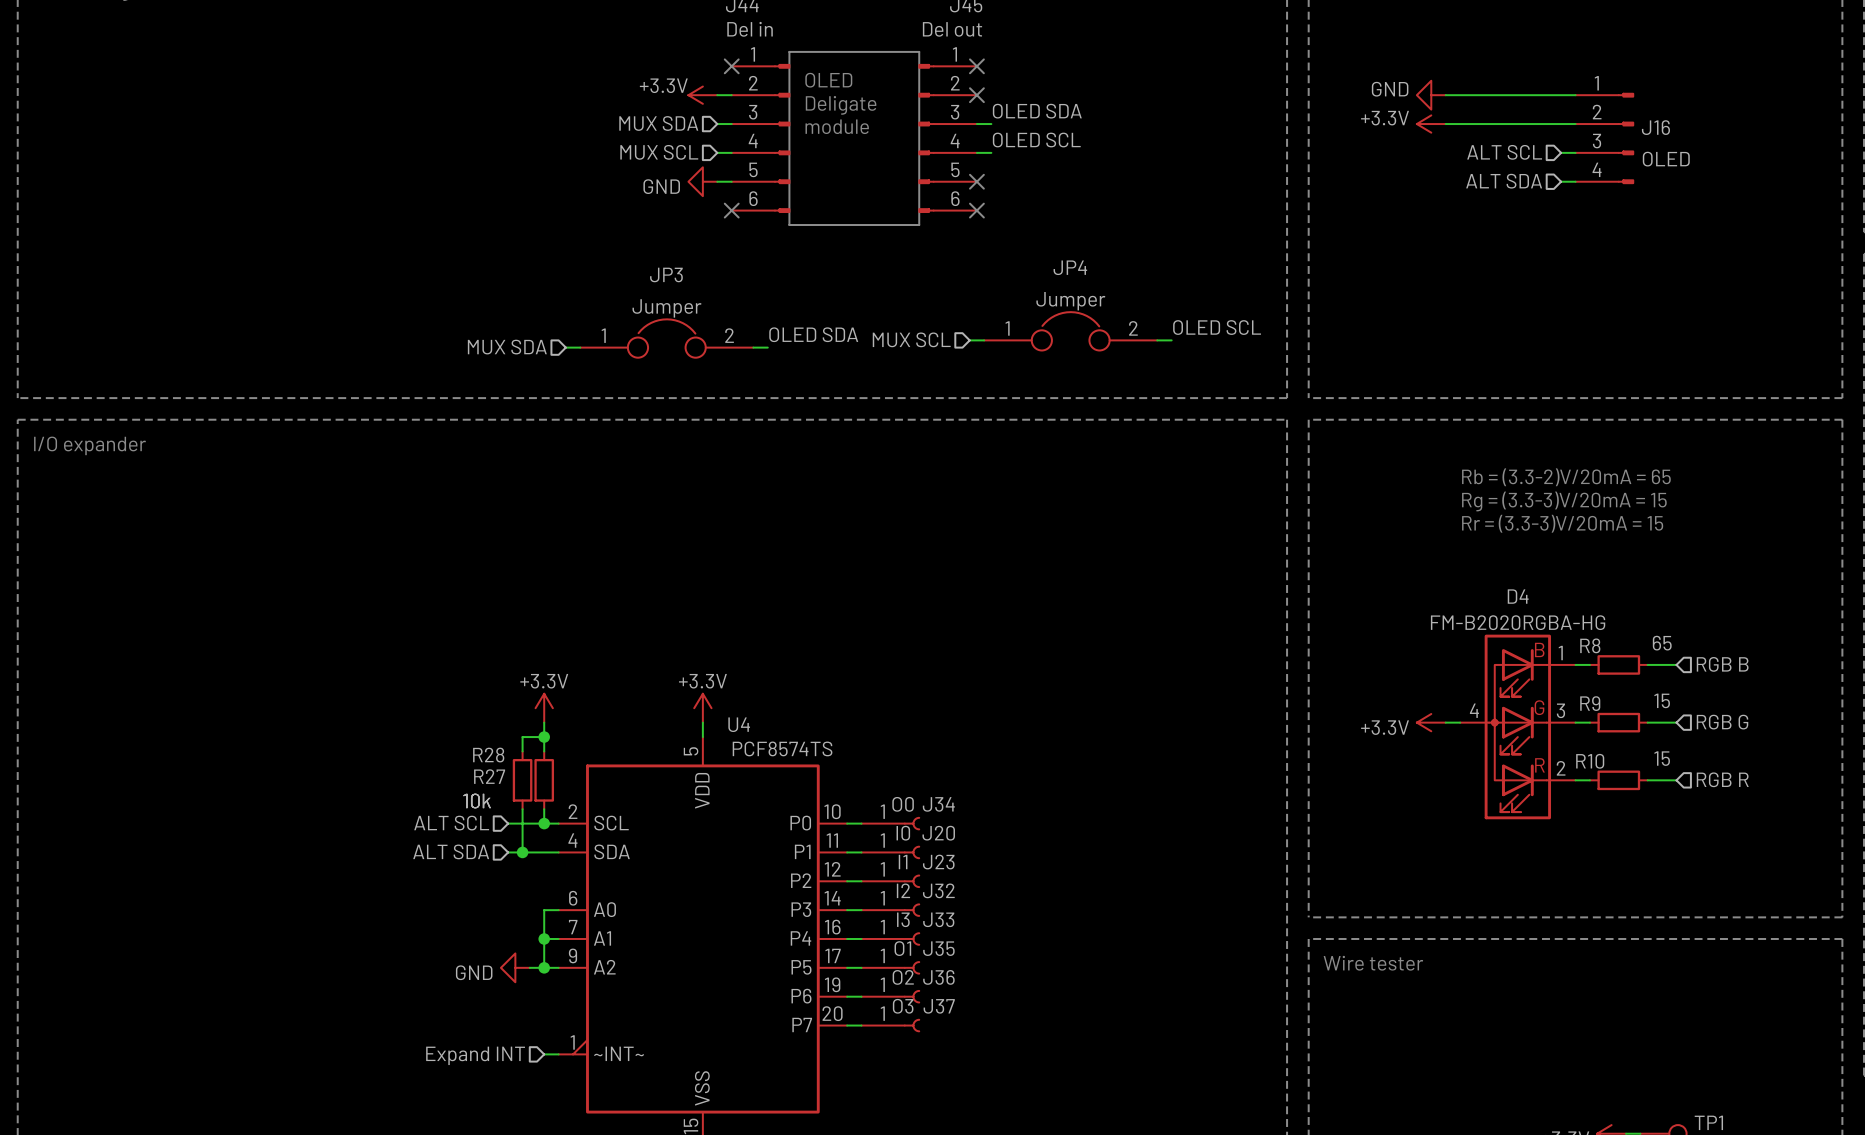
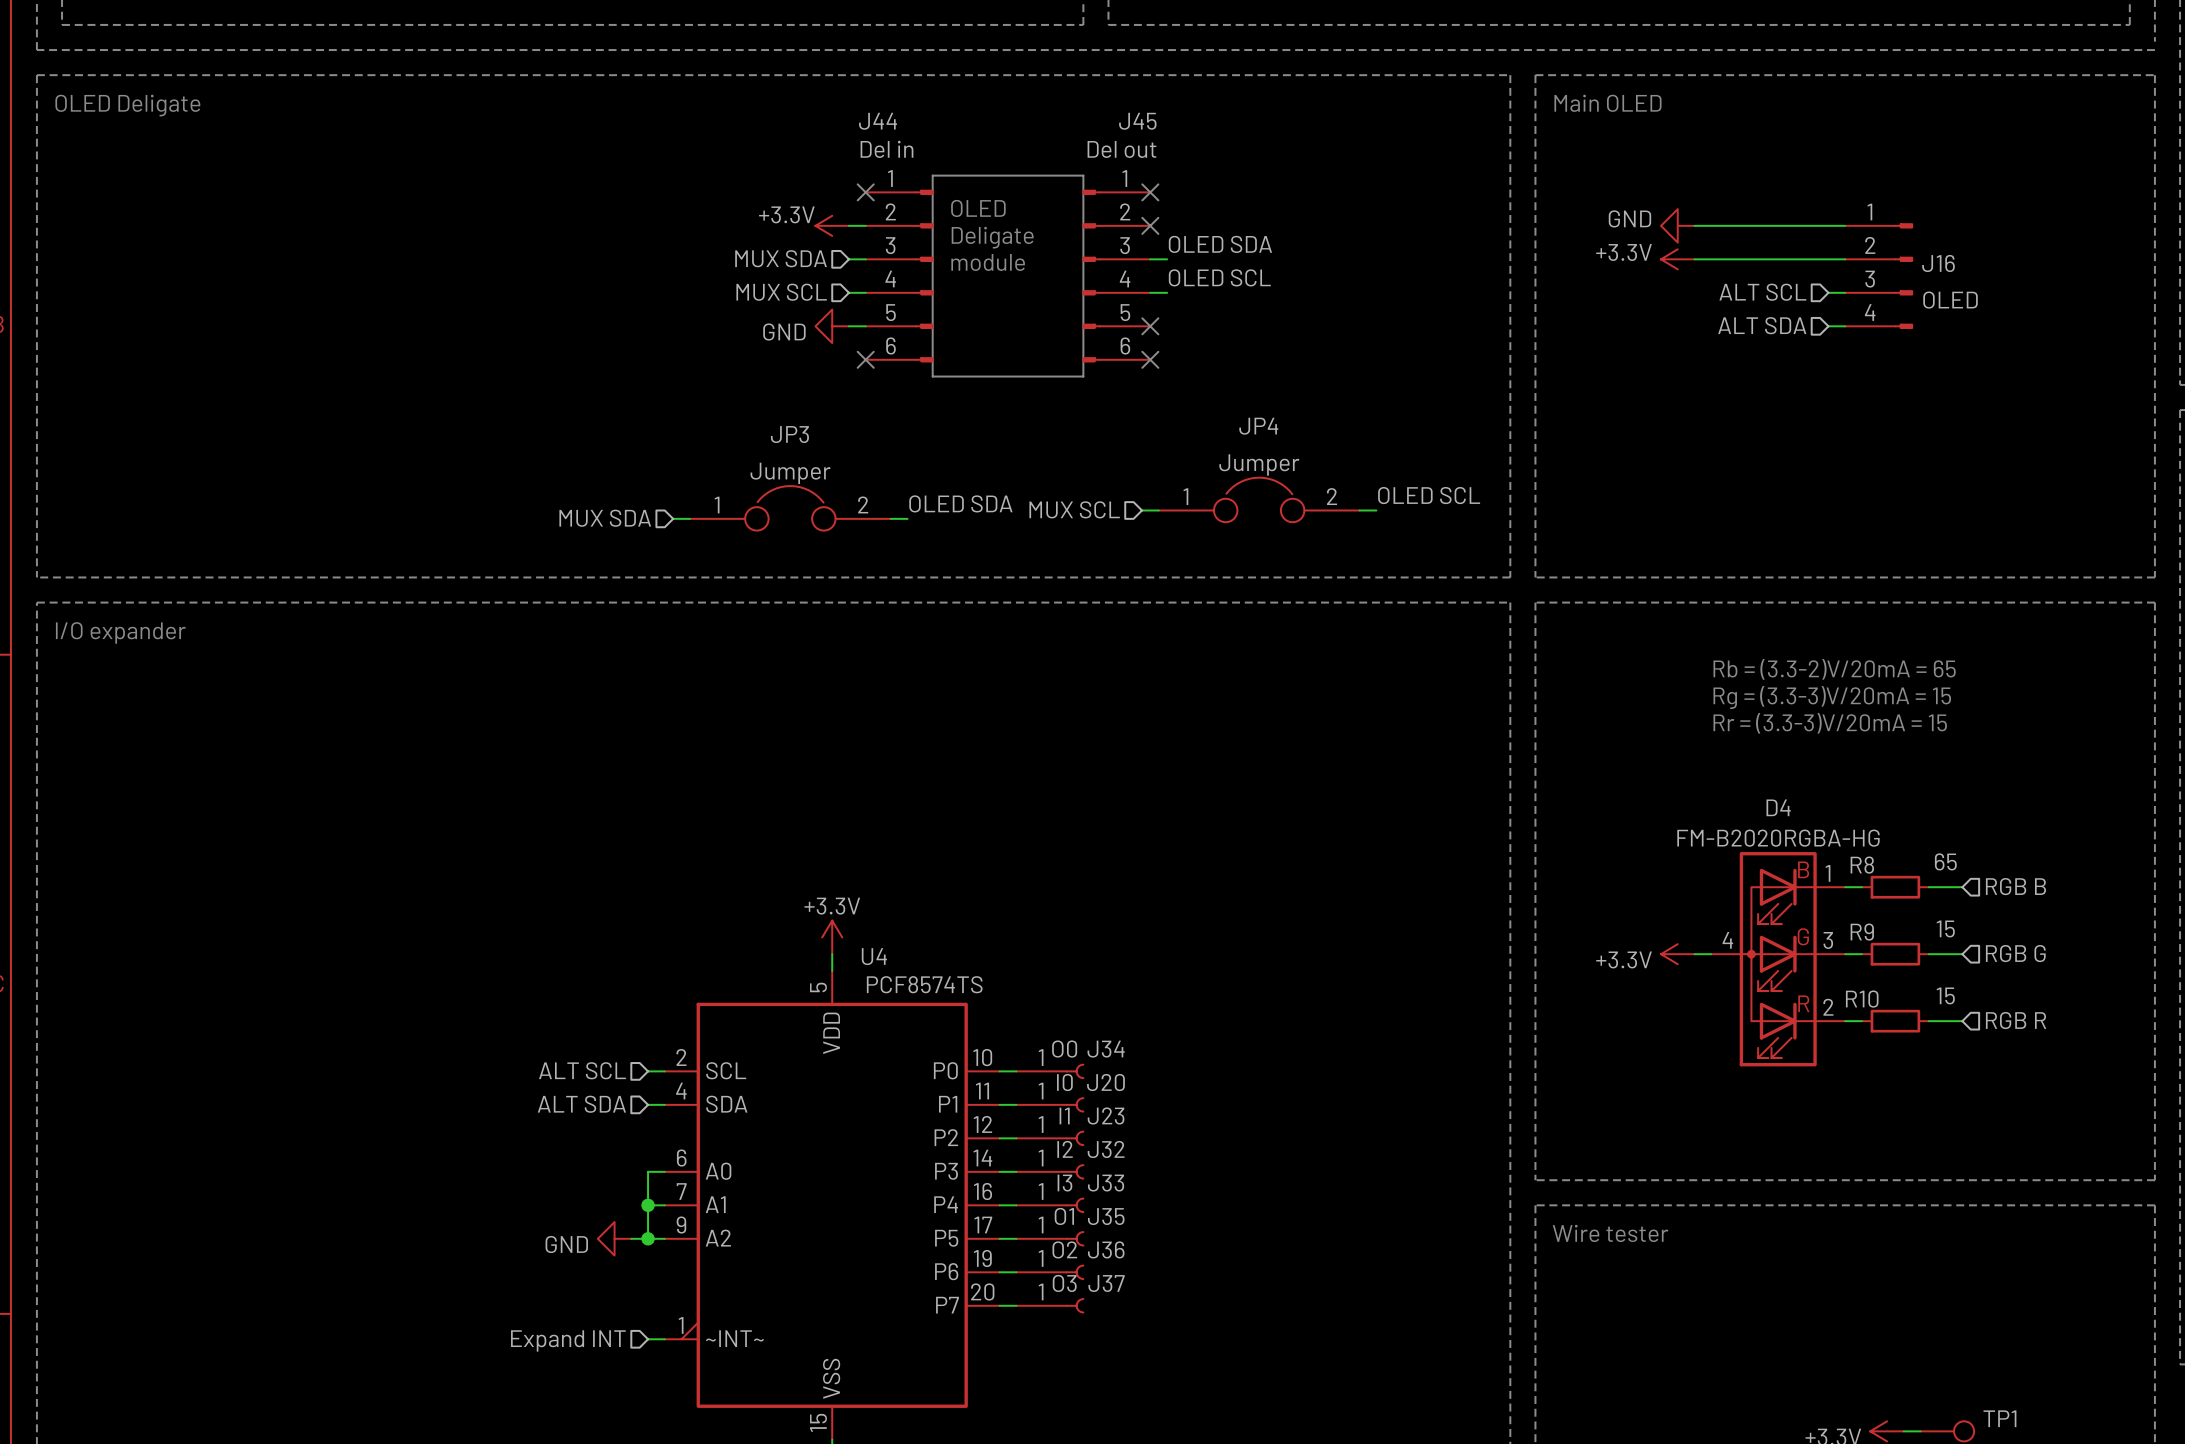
power symbol: +3.3V (544, 708) -> none
wire: (544, 722) (544, 751) -> none
wire: (544, 737) (522, 737) (522, 751) -> none
junction: (544, 737) -> none
R27: 10k (522, 780) -> none
R28: 10k (544, 780) -> none
wire: (522, 809) (522, 852) -> none
wire: (544, 809) (544, 823) (508, 823) -> none
hierarchical label position: ALT SCL (451, 823) -> ALT SCL (582, 1070)
junction: (544, 823) -> none
hierarchical label position: ALT SDA (451, 851) -> ALT SDA (581, 1104)
wire: (508, 852) (544, 852) -> none
junction: (522, 852) -> none

